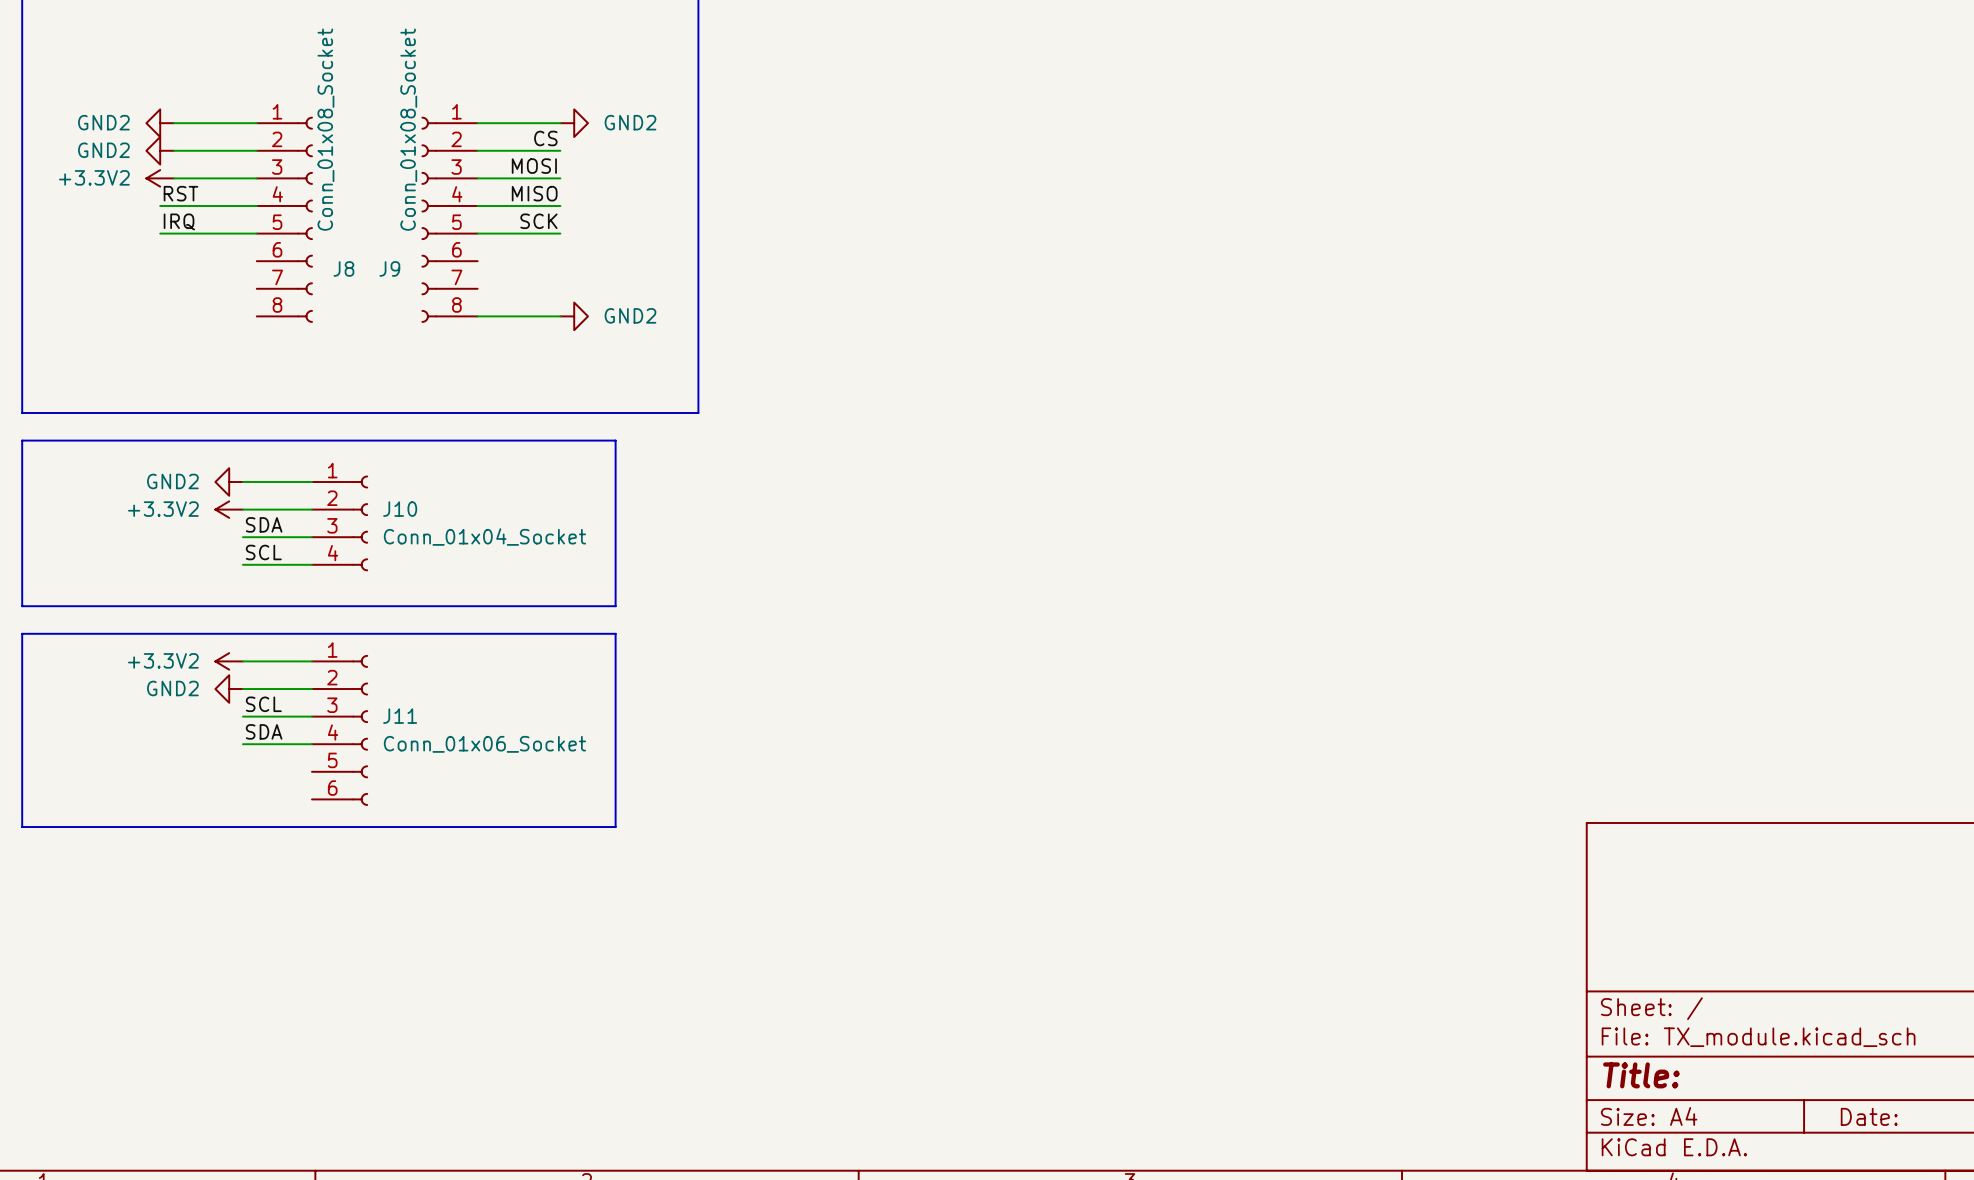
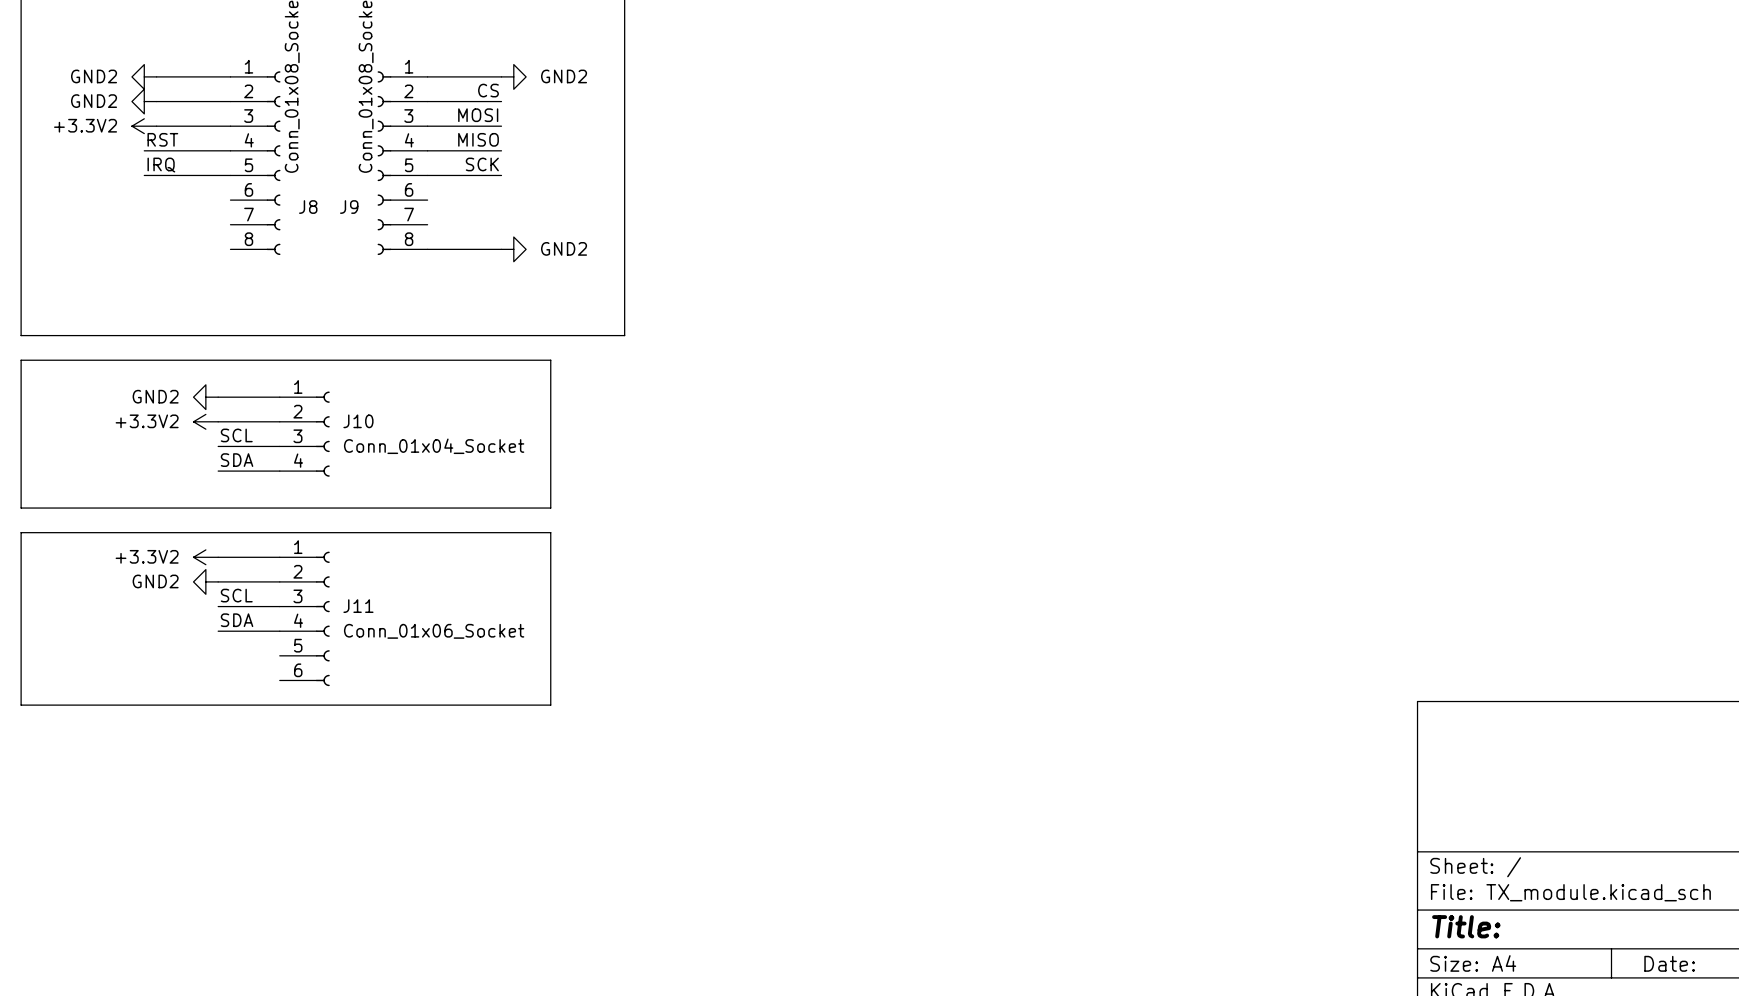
label: SDA (264, 524) -> SCL (236, 435)
label: SCL (263, 552) -> SDA (237, 460)

